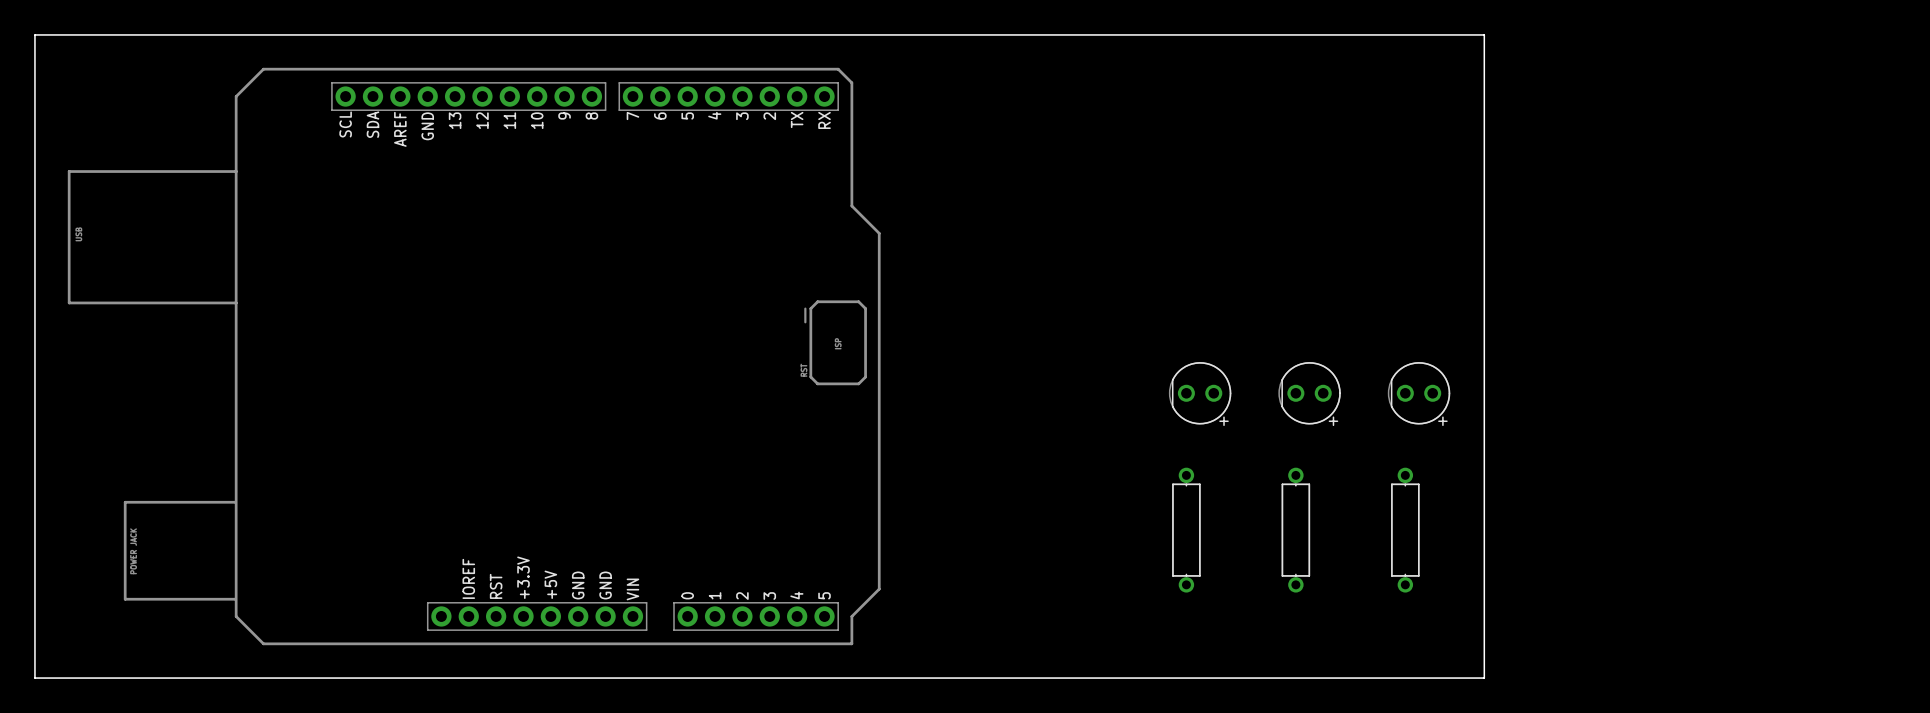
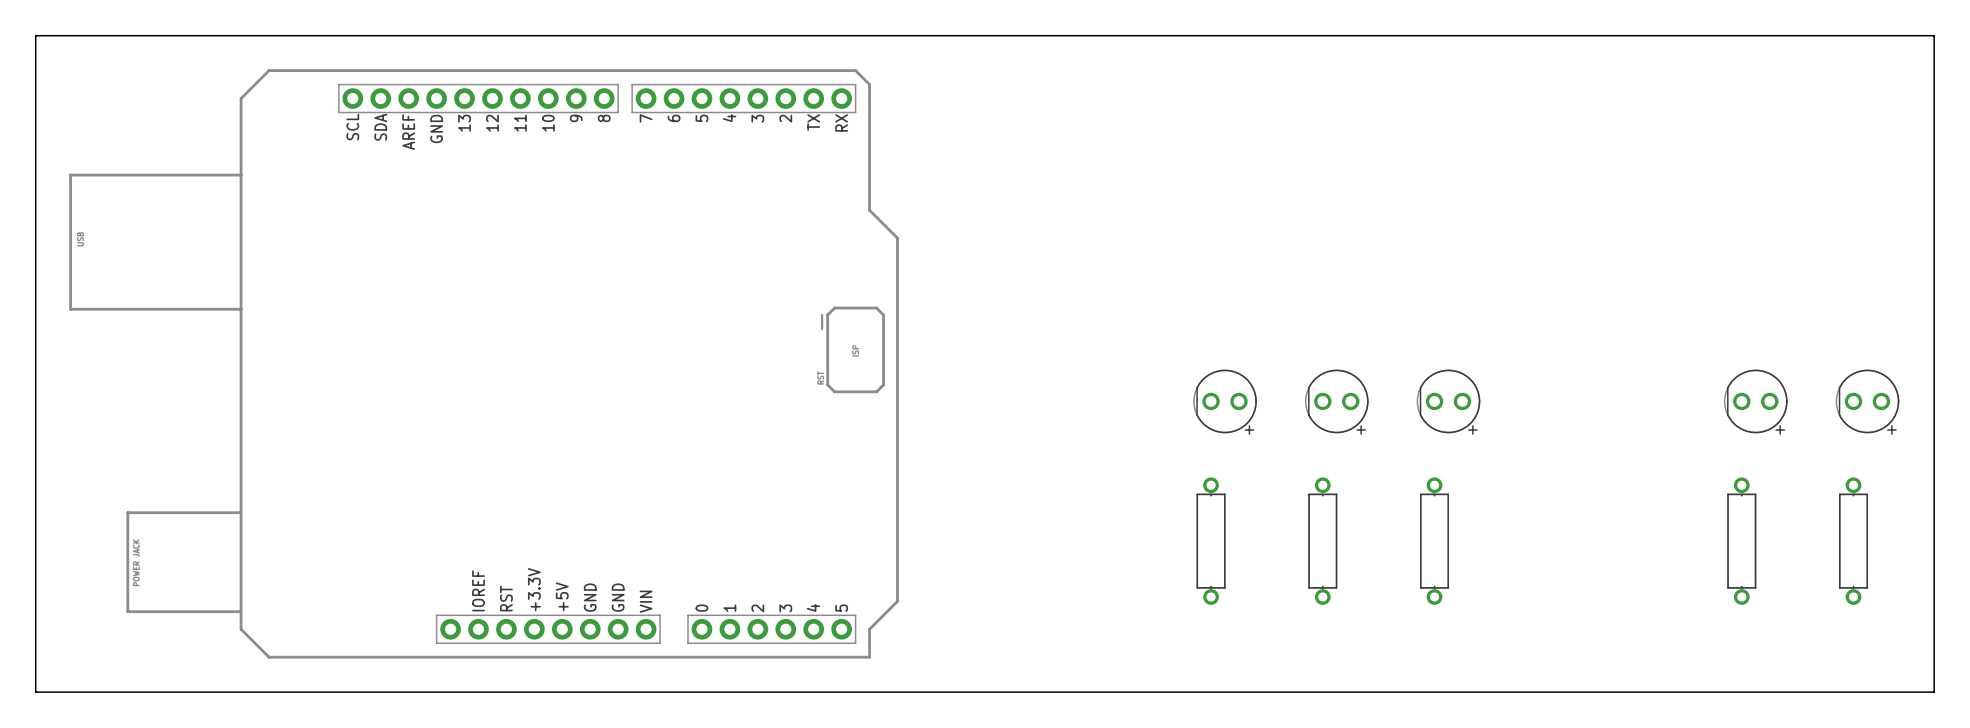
board edge: (1484, 34) (1484, 678) -> (1515, 35) (1934, 35) (1934, 692) (1515, 692)
part: none -> (1755, 402)
part: none -> (1867, 402)
part: none -> (1741, 541)
part: none -> (1853, 541)

